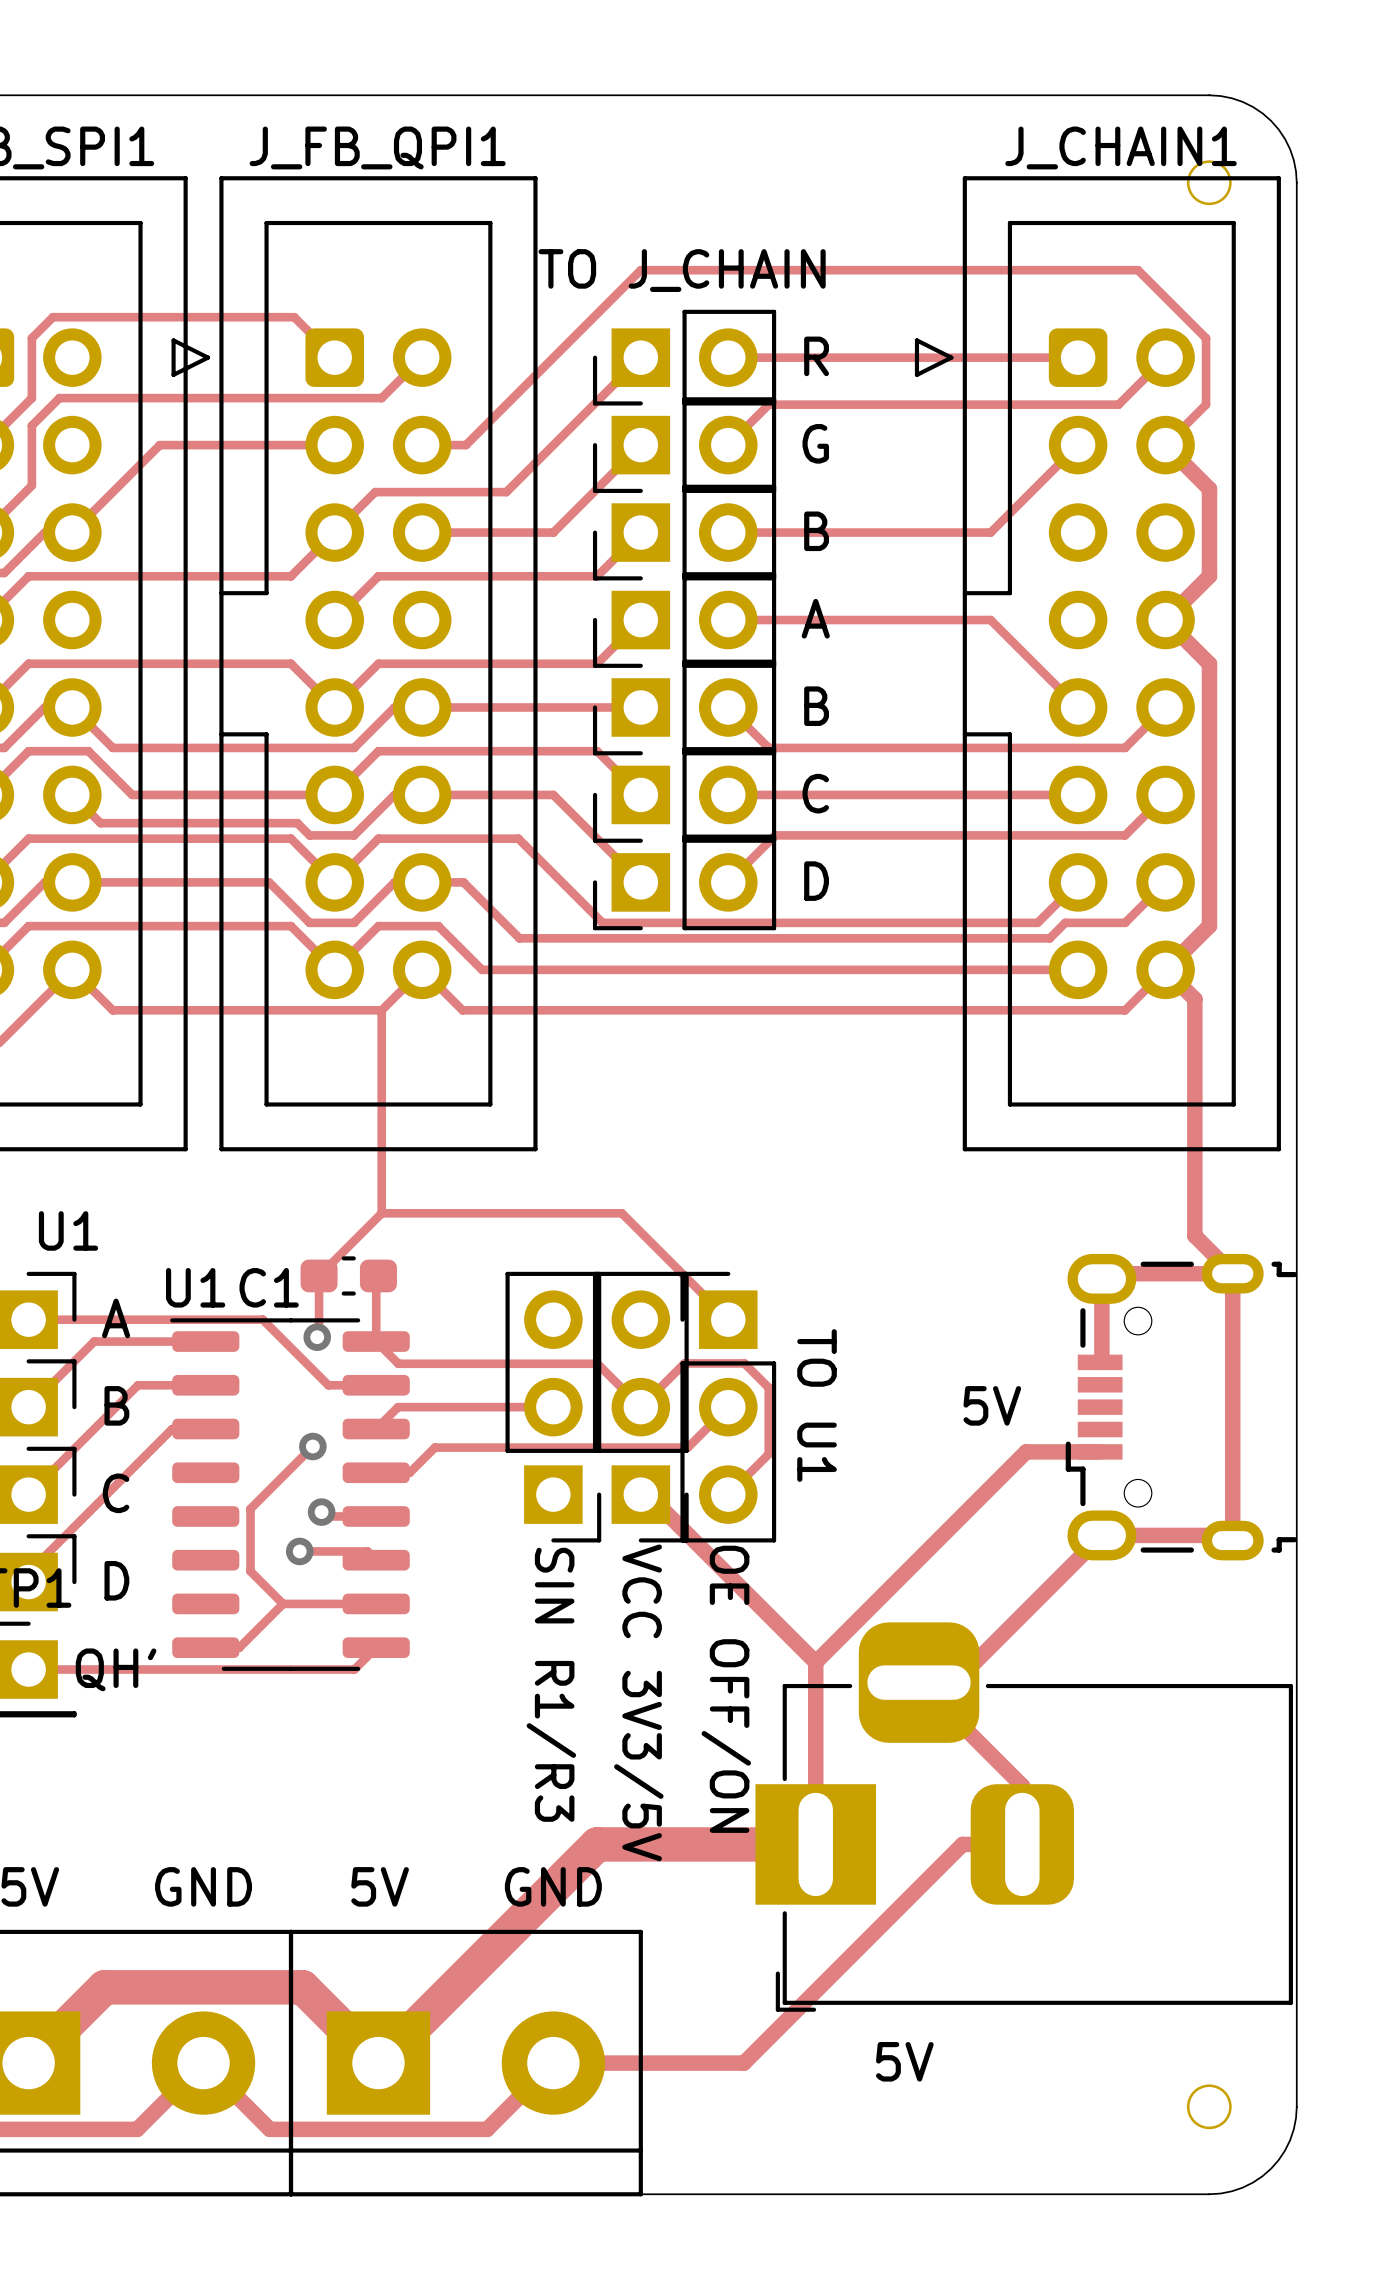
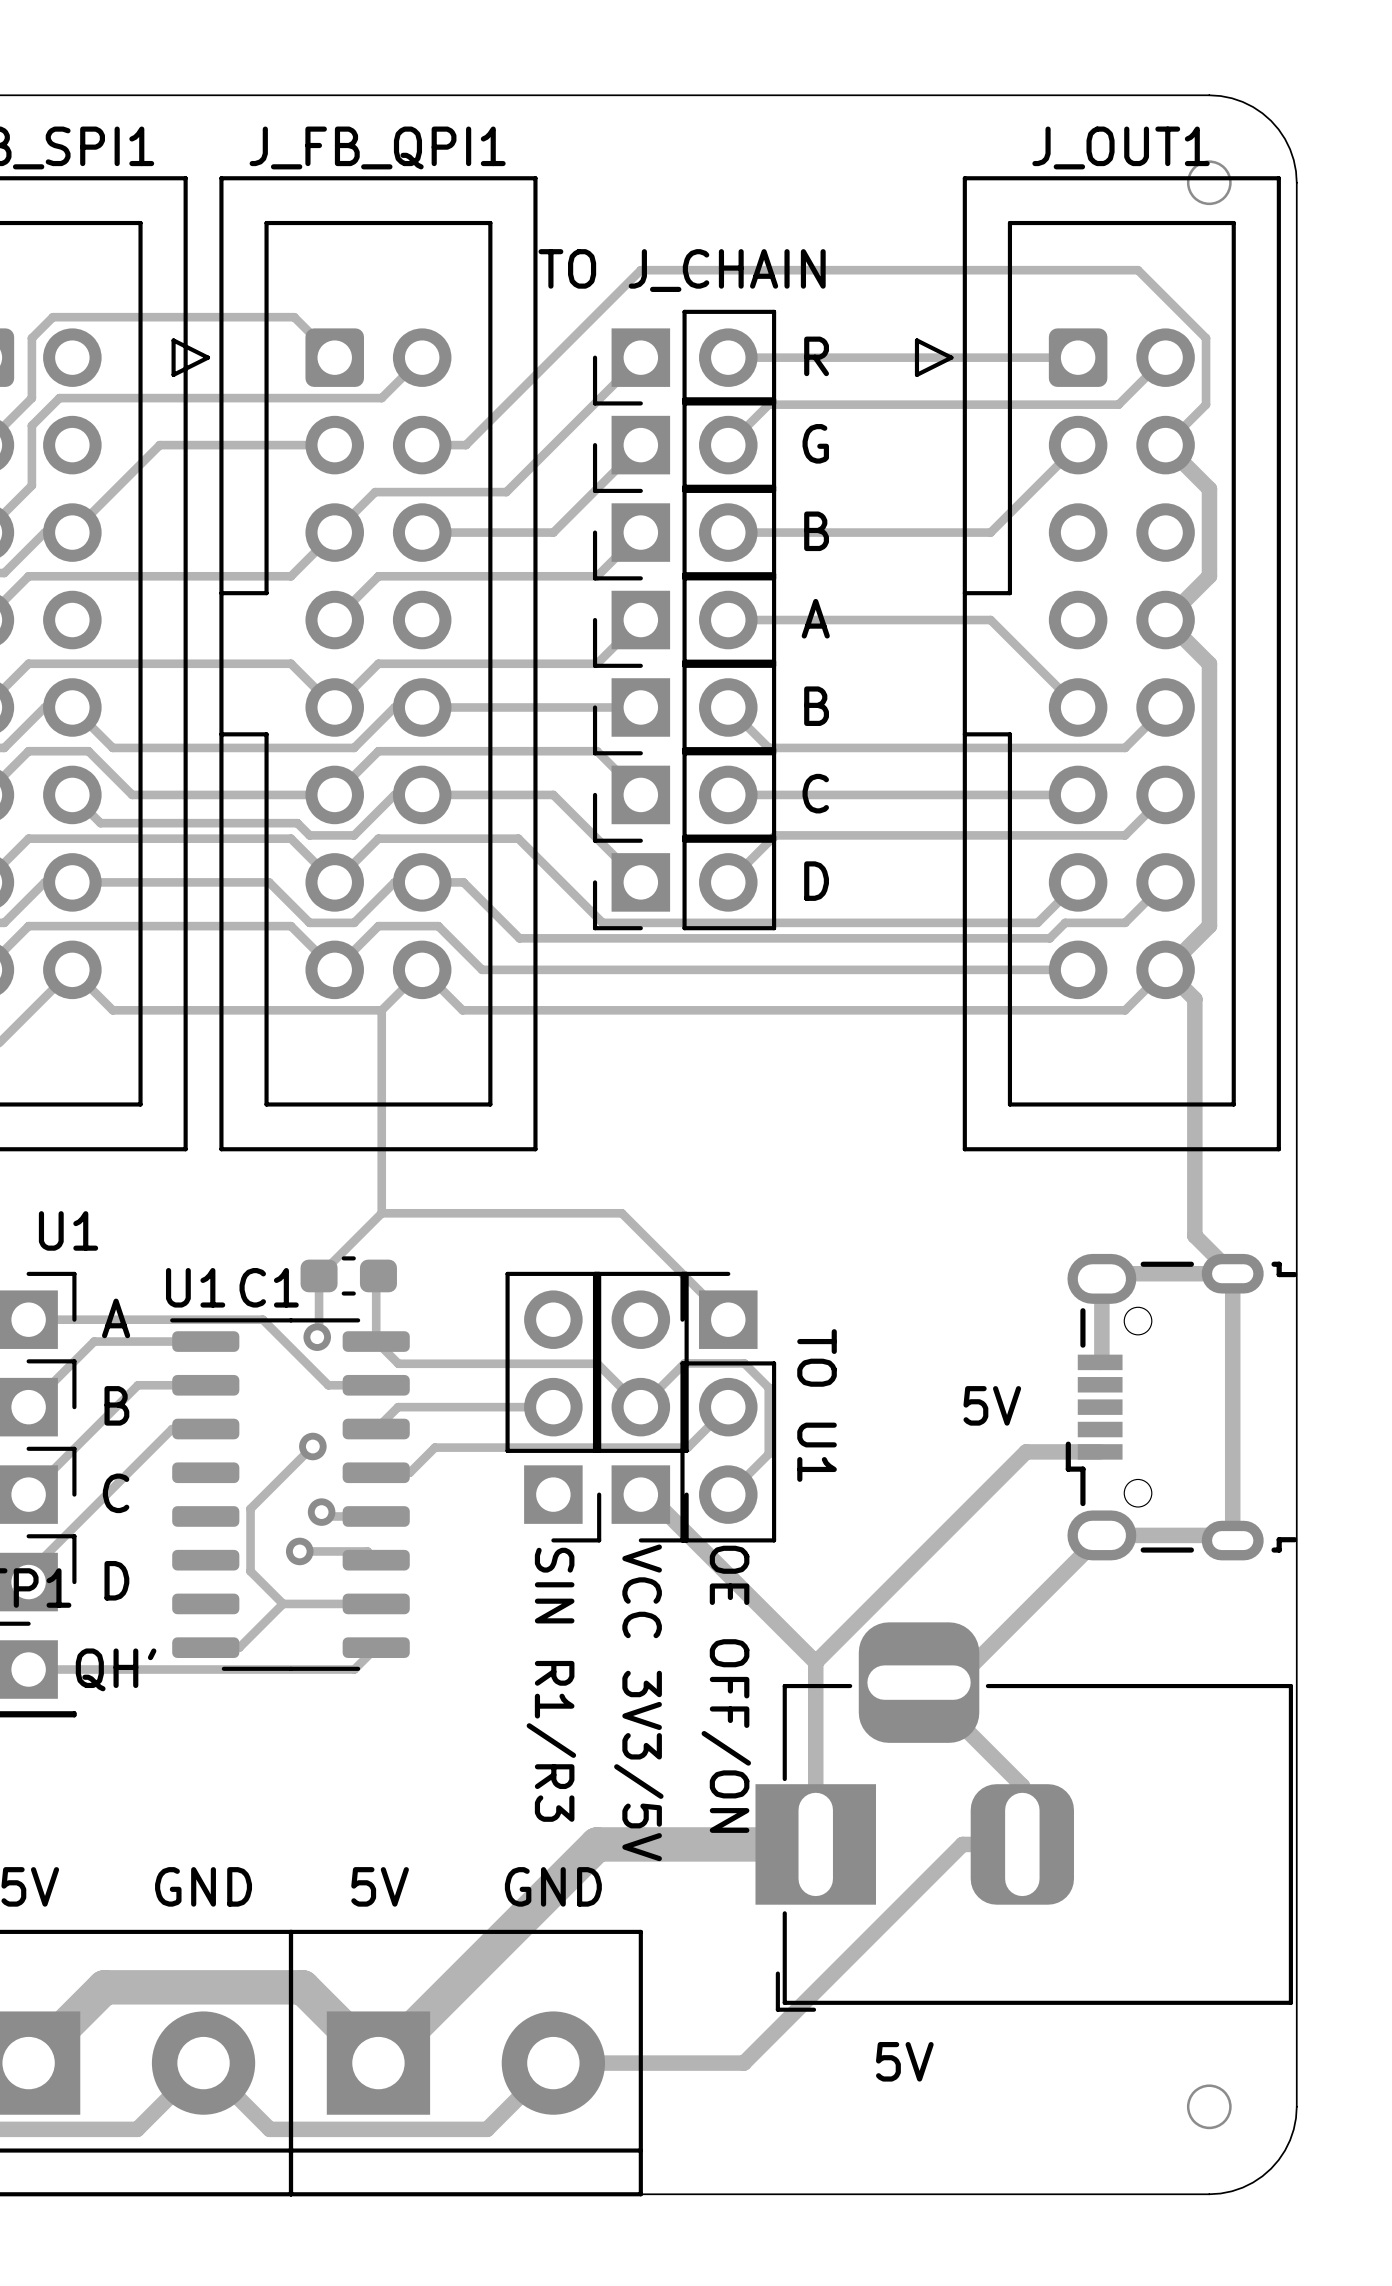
J_CHAIN1 name: J_CHAIN1 (1121, 147) -> J_OUT1 (1121, 147)

